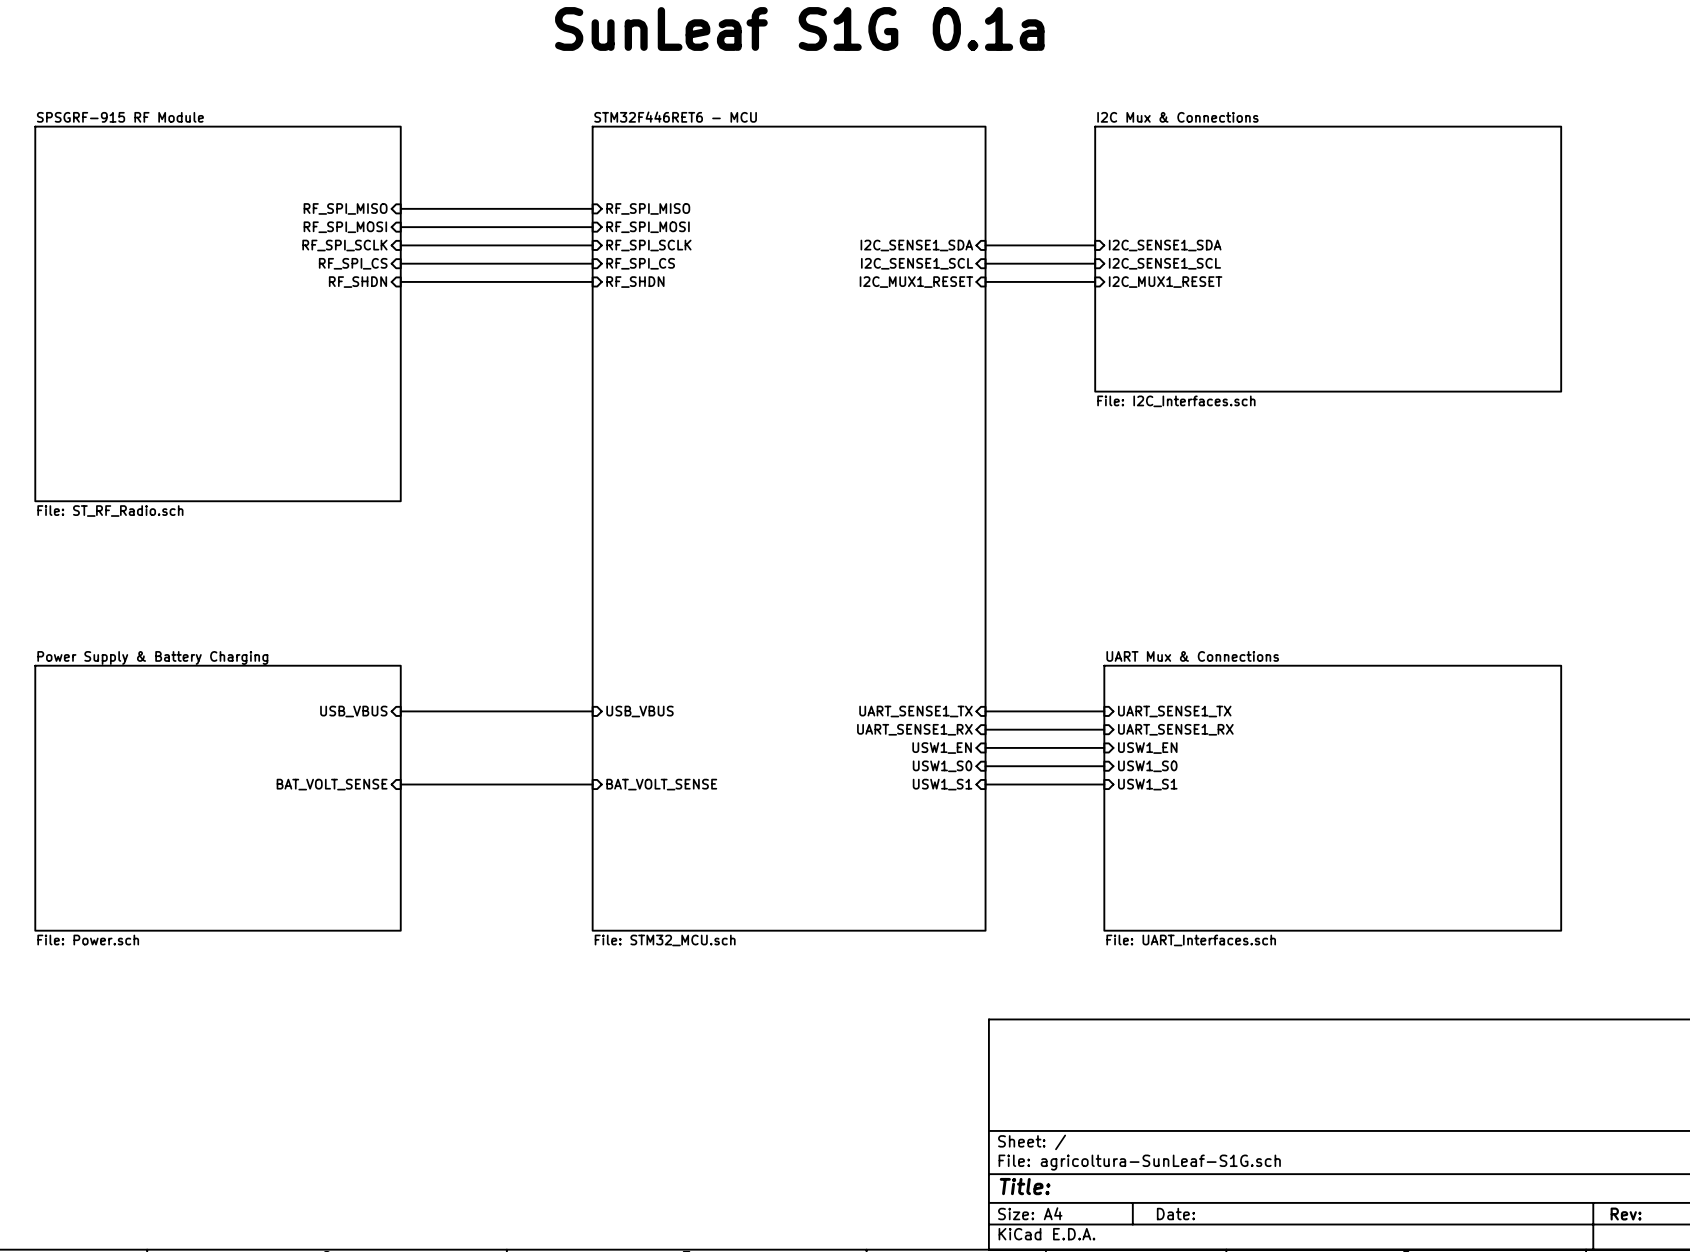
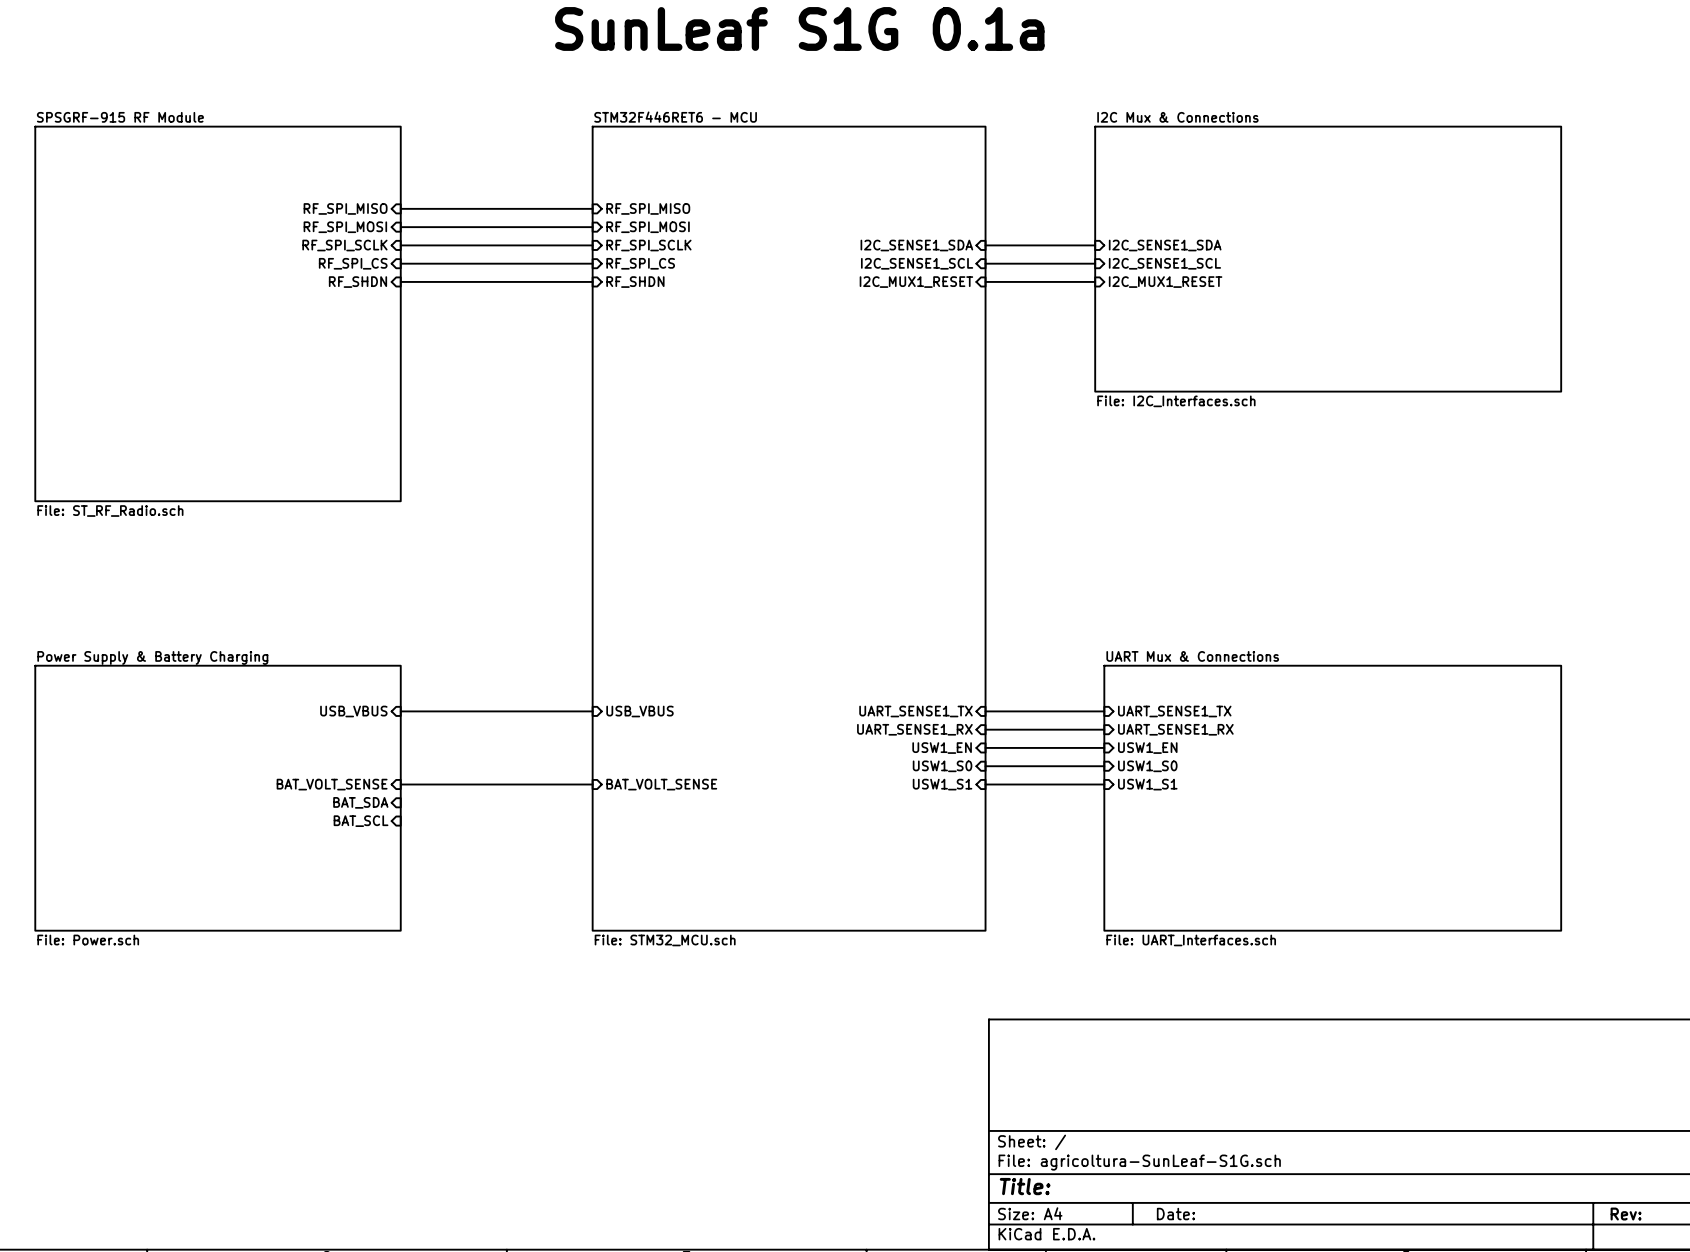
sheet pin: none -> BAT_SDA (360, 802)
sheet pin: none -> BAT_SCL (361, 821)

